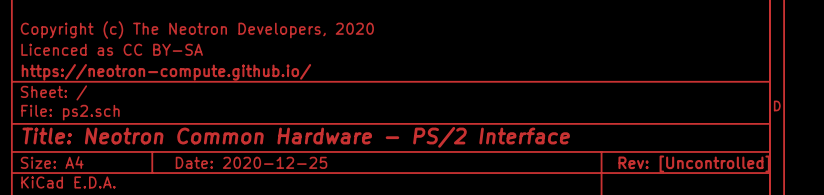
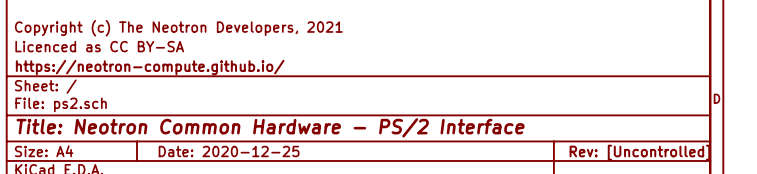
title block: Copyright (c) The Neotron Developers, 2020 (197, 29) -> Copyright (c) The Neotron Developers, 2021 (178, 28)

